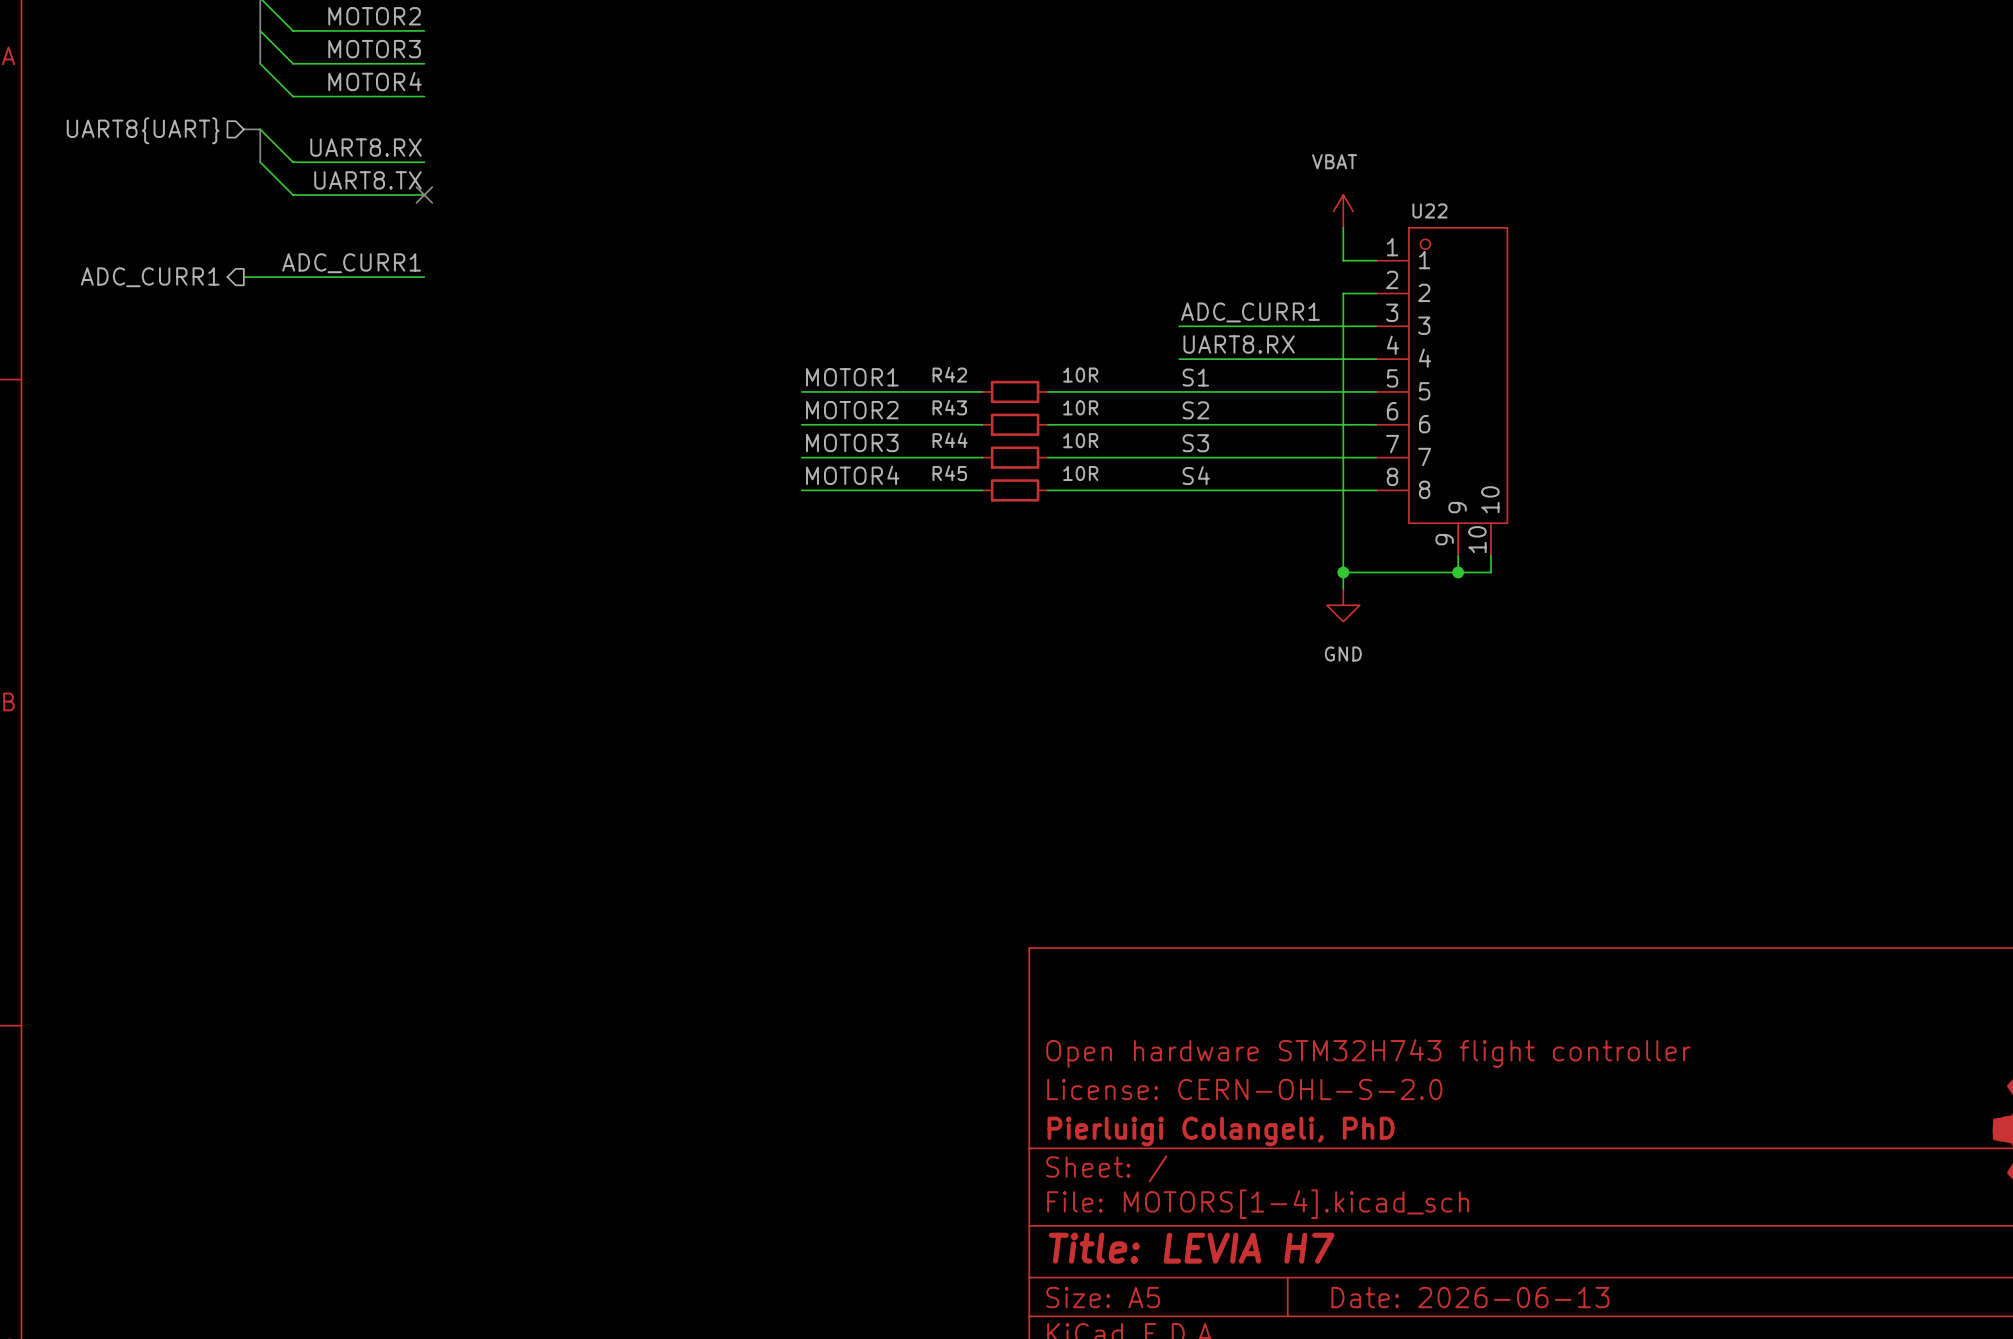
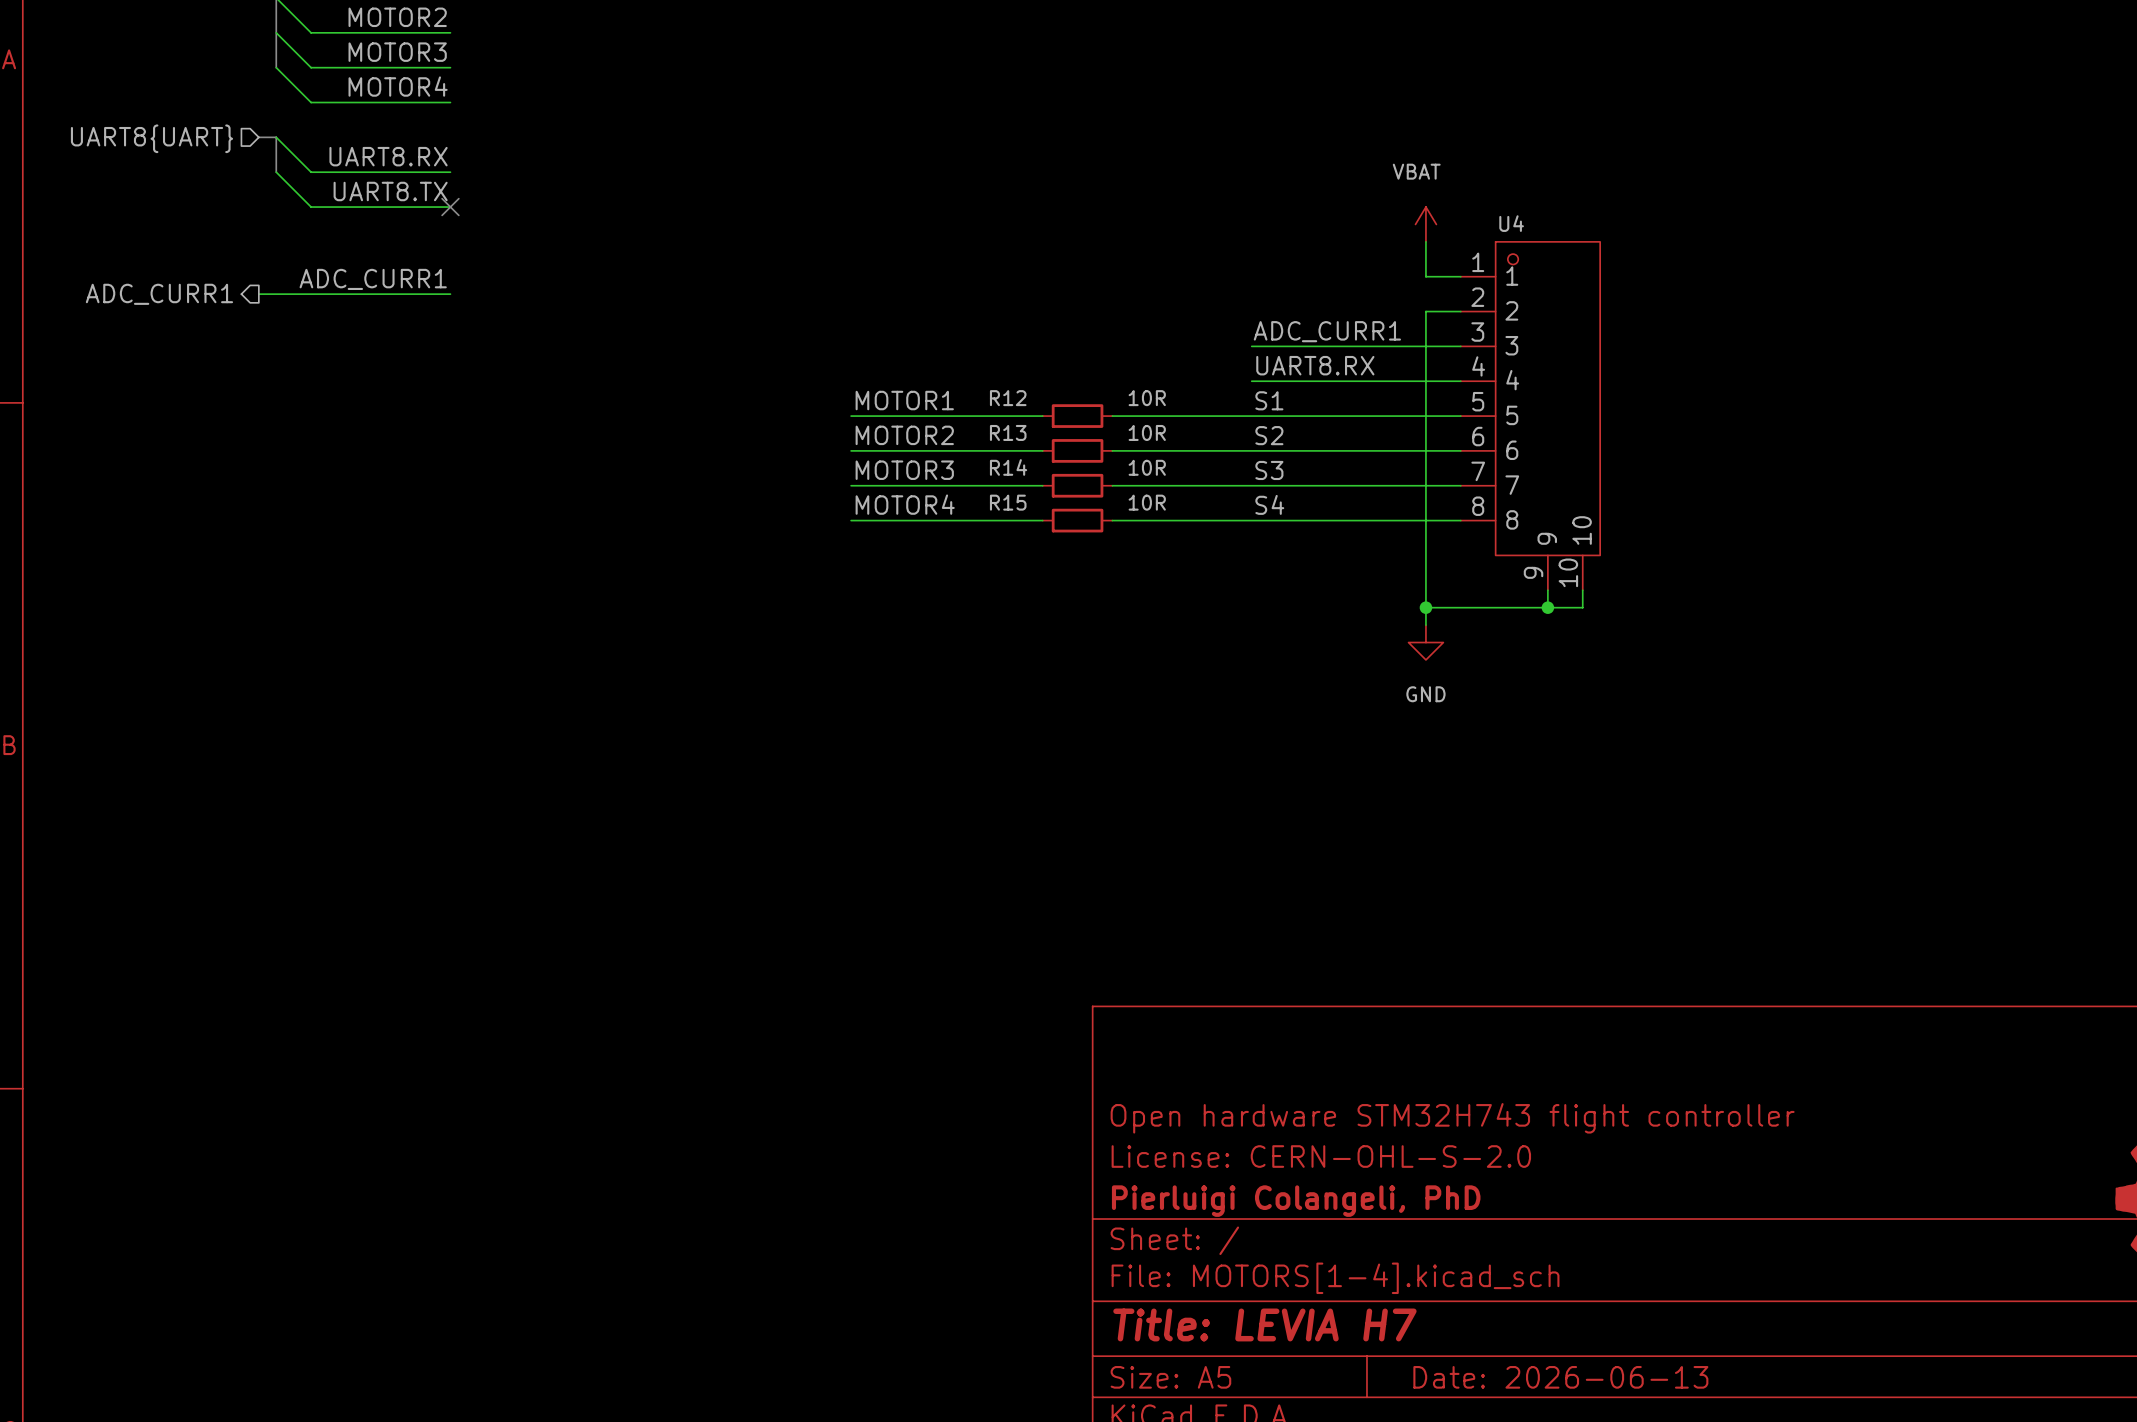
U22 name: U22 (1429, 210) -> U4 (1511, 223)
R42 name: R42 (949, 374) -> R12 (1008, 398)
R43 name: R43 (949, 407) -> R13 (1008, 432)
R44 name: R44 (950, 440) -> R14 (1008, 467)
R45 name: R45 (949, 473) -> R15 (1008, 502)

